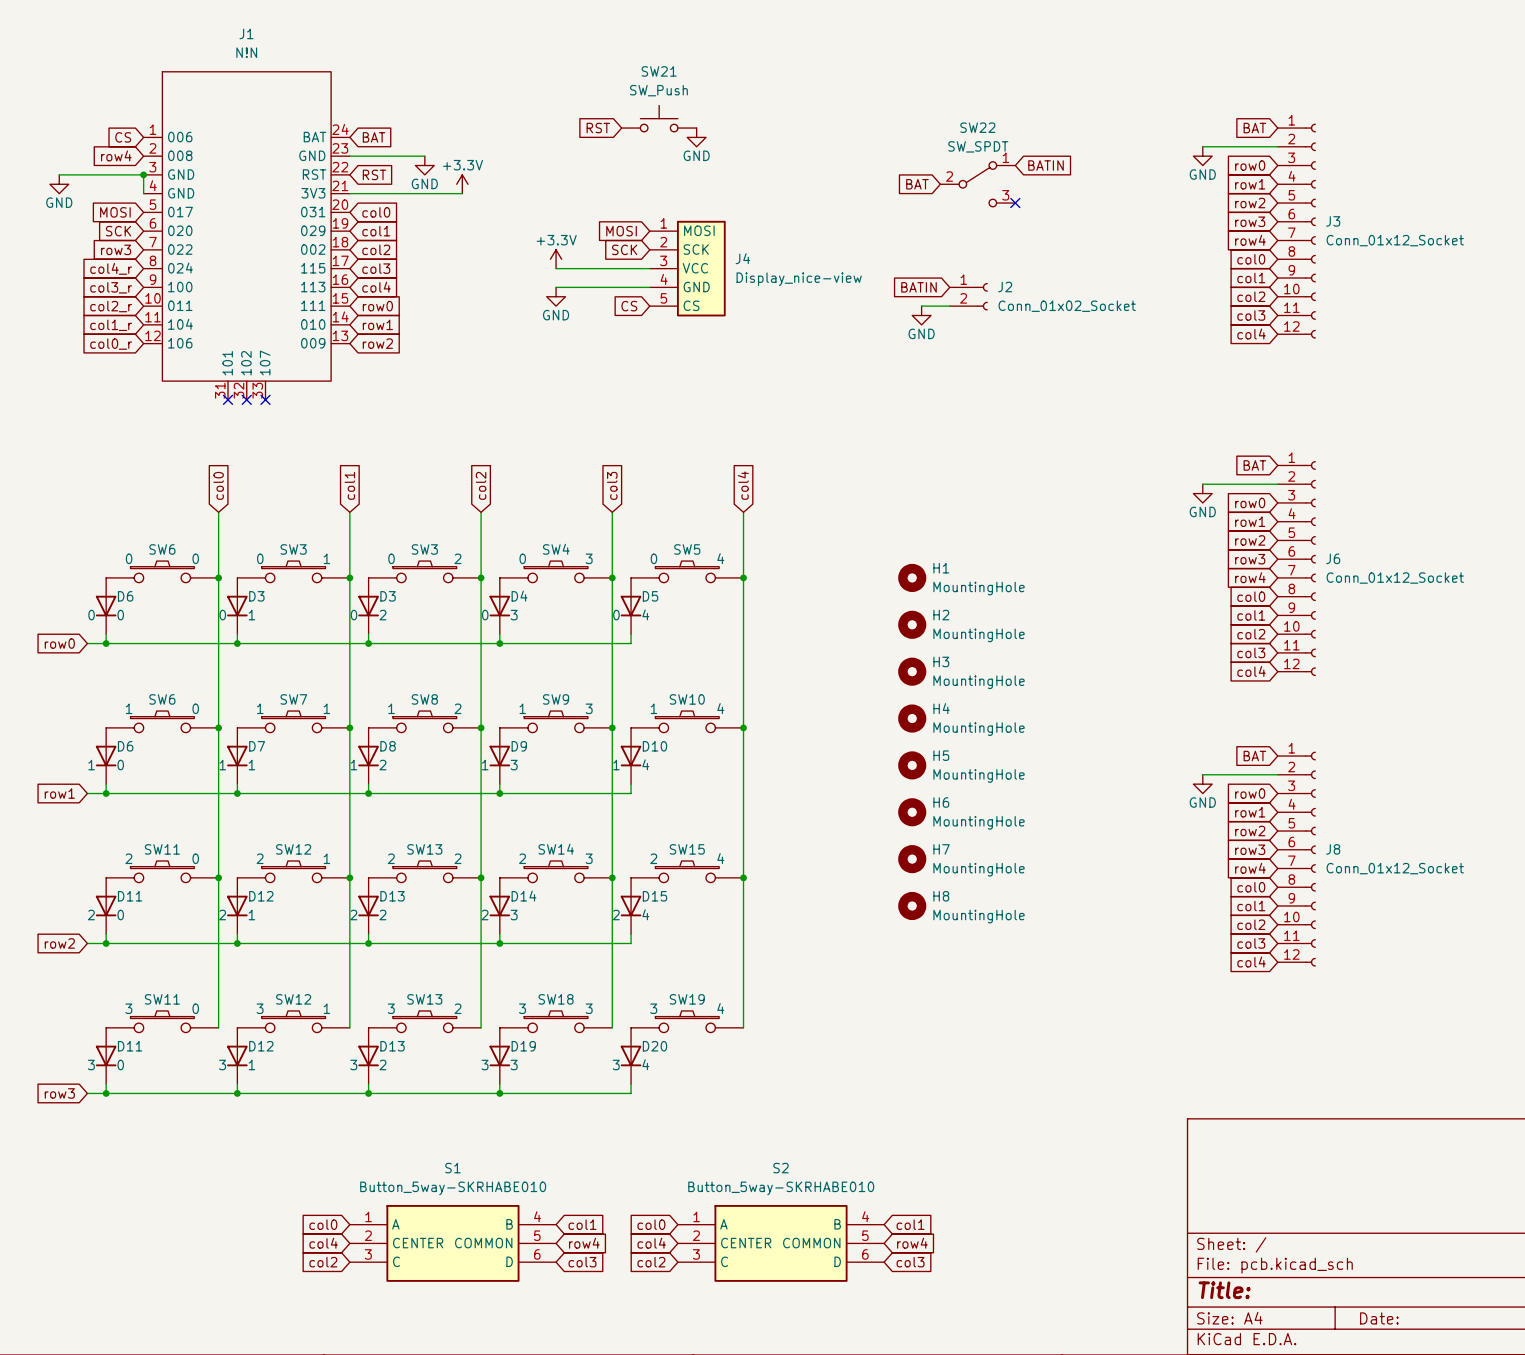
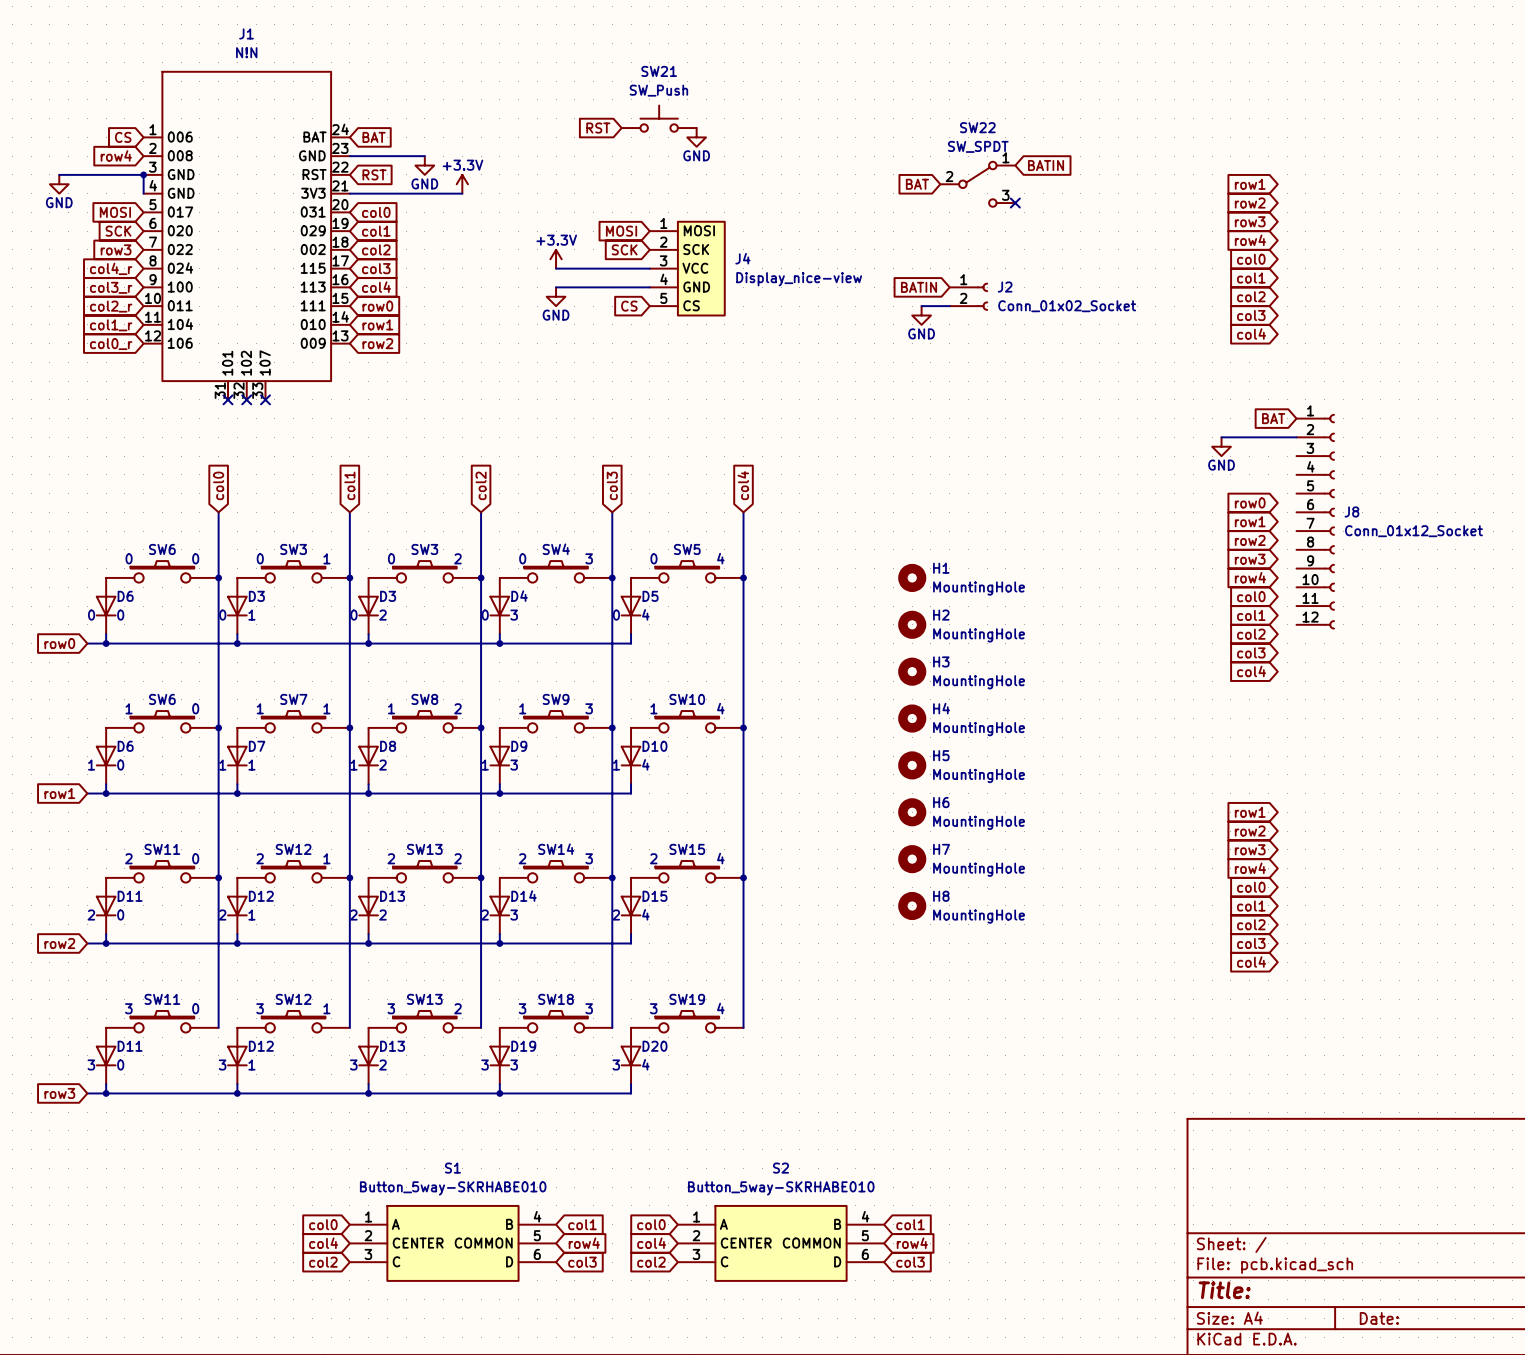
global label: BAT (1254, 128) -> none
wire: (1202, 146) (1277, 146) -> none
power symbol: GND (1202, 156) -> none
global label: row0 (1250, 165) -> none
J3: Conn_01x12_Socket (1296, 231) -> none
global label position: BAT (1254, 465) -> BAT (1273, 418)
wire: (1202, 484) (1277, 484) -> (1221, 437) (1296, 437)
power symbol position: GND (1202, 493) -> GND (1221, 446)
J6: Conn_01x12_Socket (1296, 568) -> none
global label: BAT (1254, 756) -> none
wire: (1202, 774) (1277, 774) -> none
power symbol: GND (1202, 784) -> none
global label: row0 (1250, 793) -> none
J8 position: (1296, 859) -> (1315, 521)

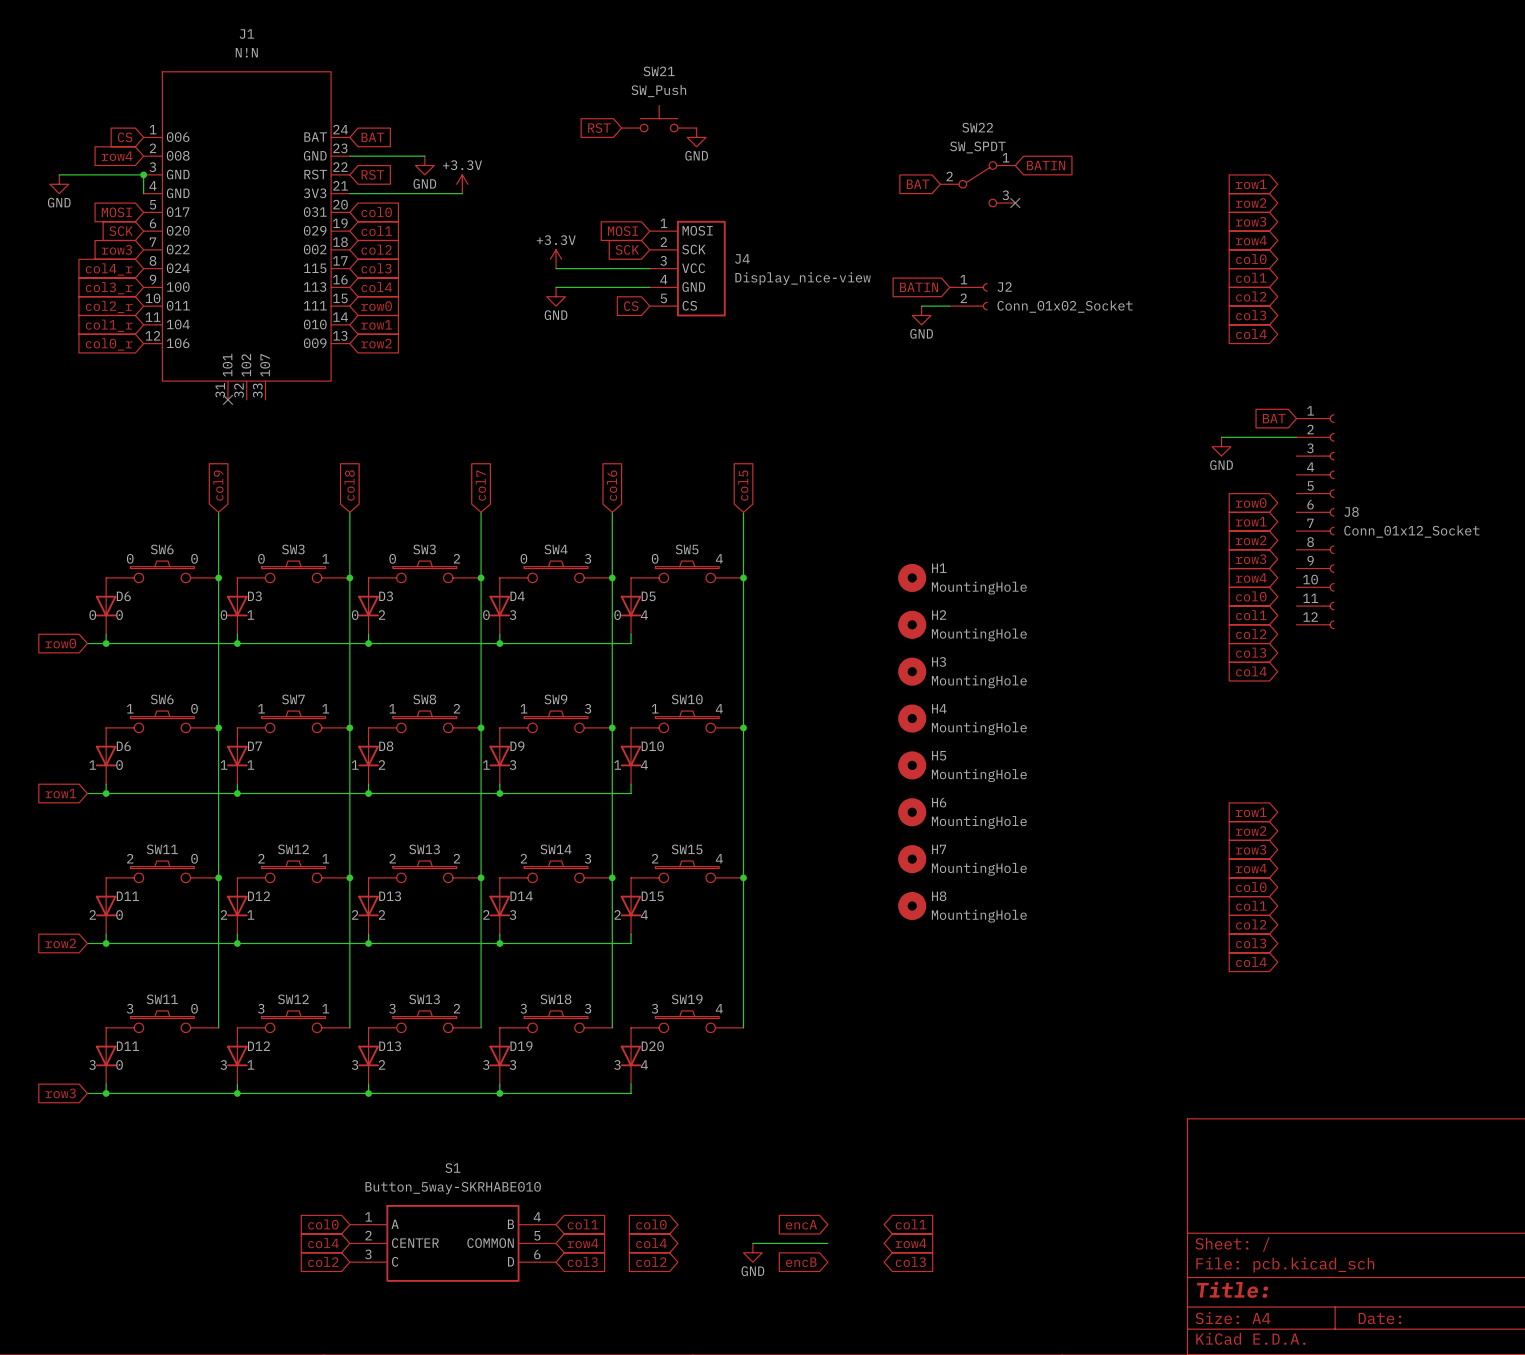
no-connect mark: (246, 399) -> none
no-connect mark: (265, 399) -> none
global label: col0 (218, 485) -> col9 (218, 485)
global label: col1 (349, 485) -> col8 (349, 485)
global label: col2 (481, 485) -> col7 (480, 485)
global label: col3 (612, 485) -> col6 (612, 485)
global label: col4 (743, 485) -> col5 (743, 485)
global label: none -> encA (801, 1224)
S2: Button_5way-SKRHABE010 (781, 1243) -> none
power symbol: none -> GND (752, 1252)
global label: none -> encB (801, 1262)

